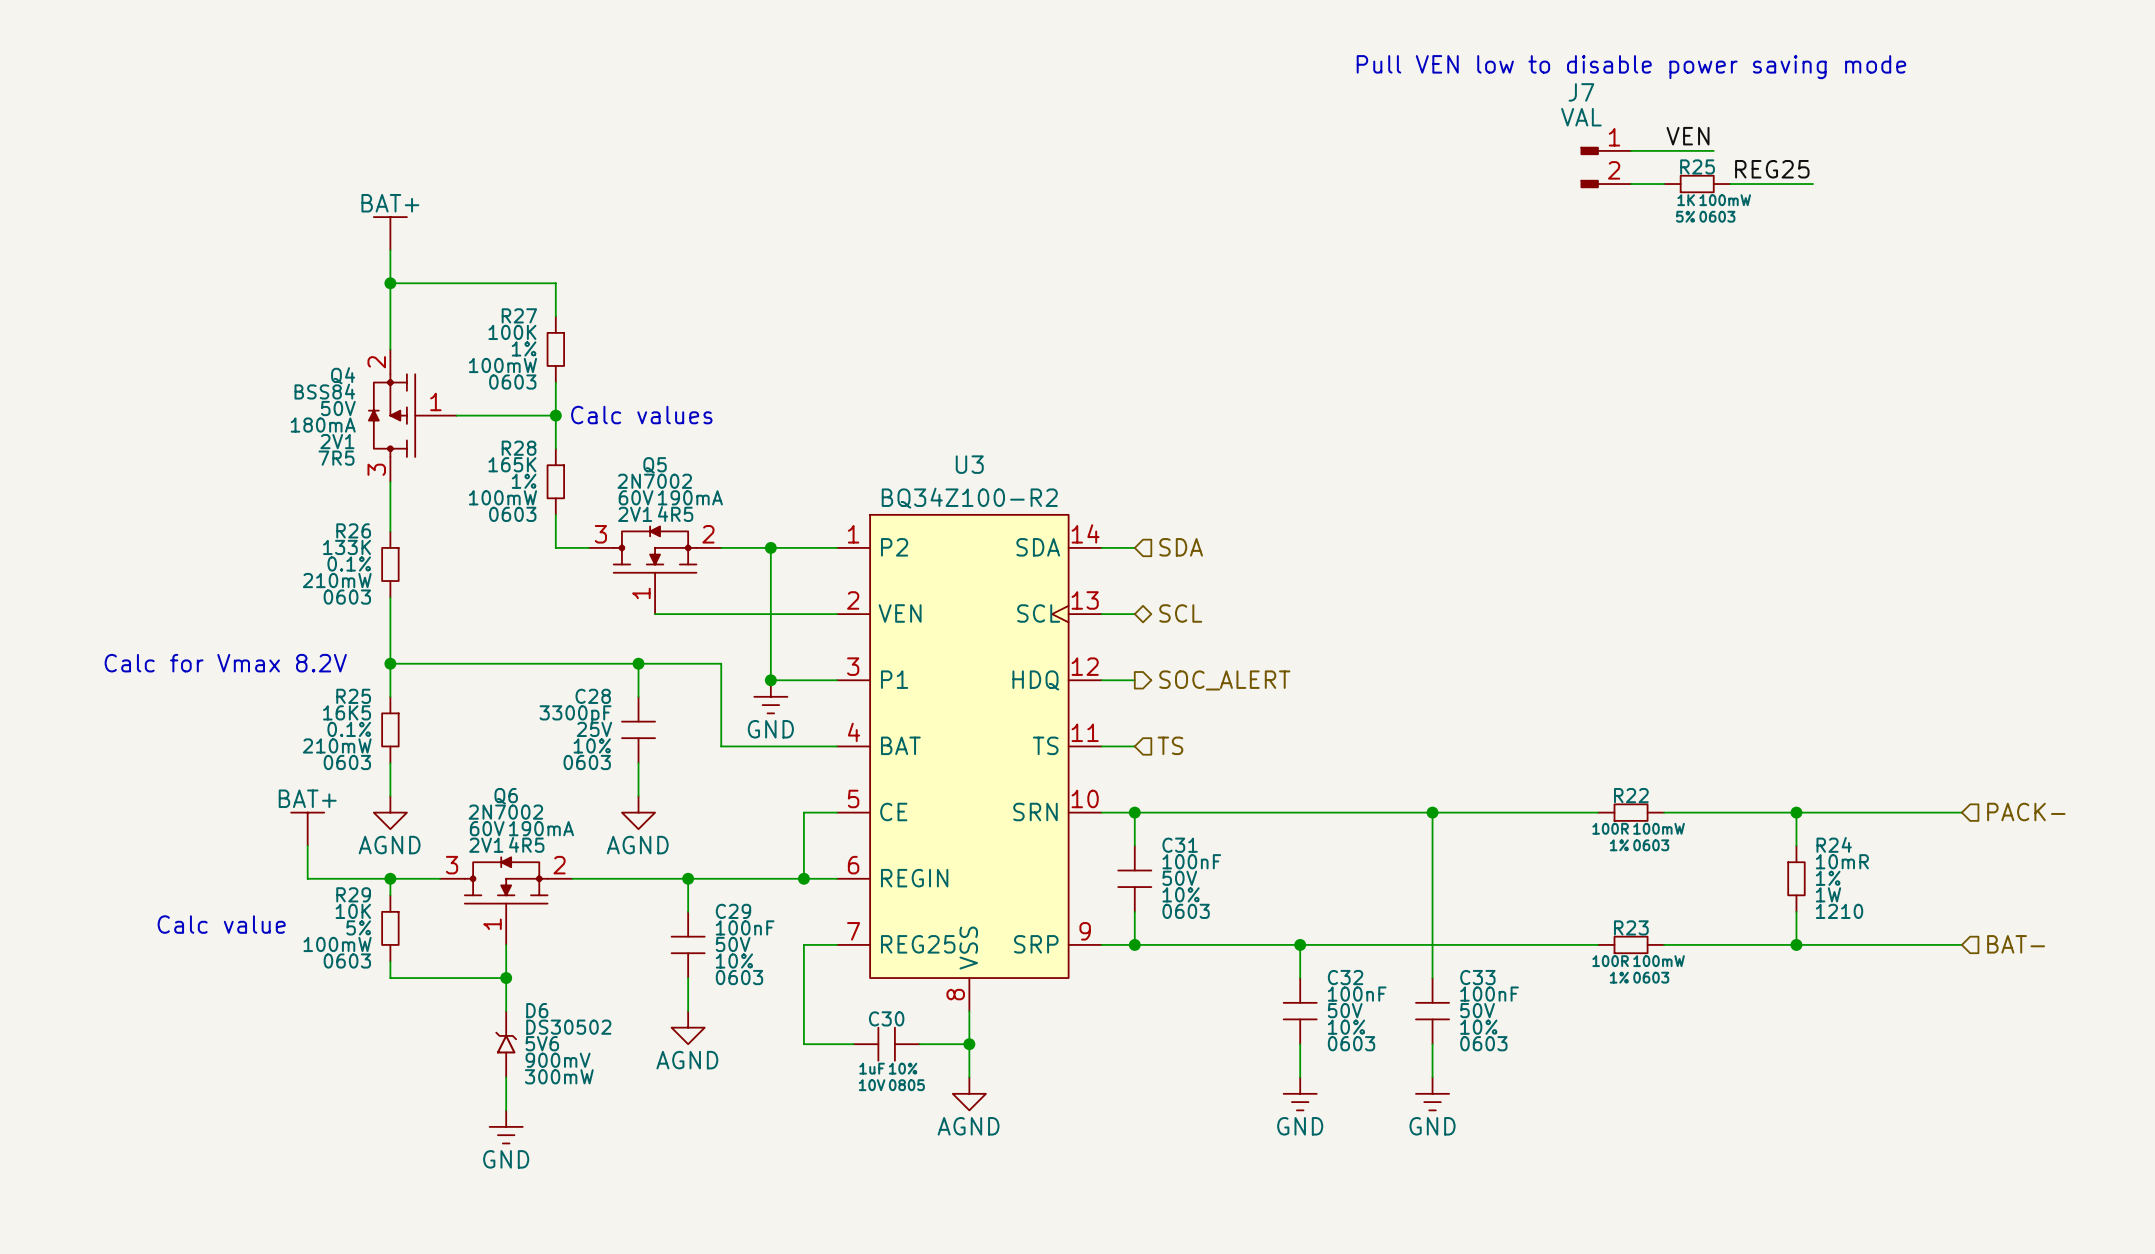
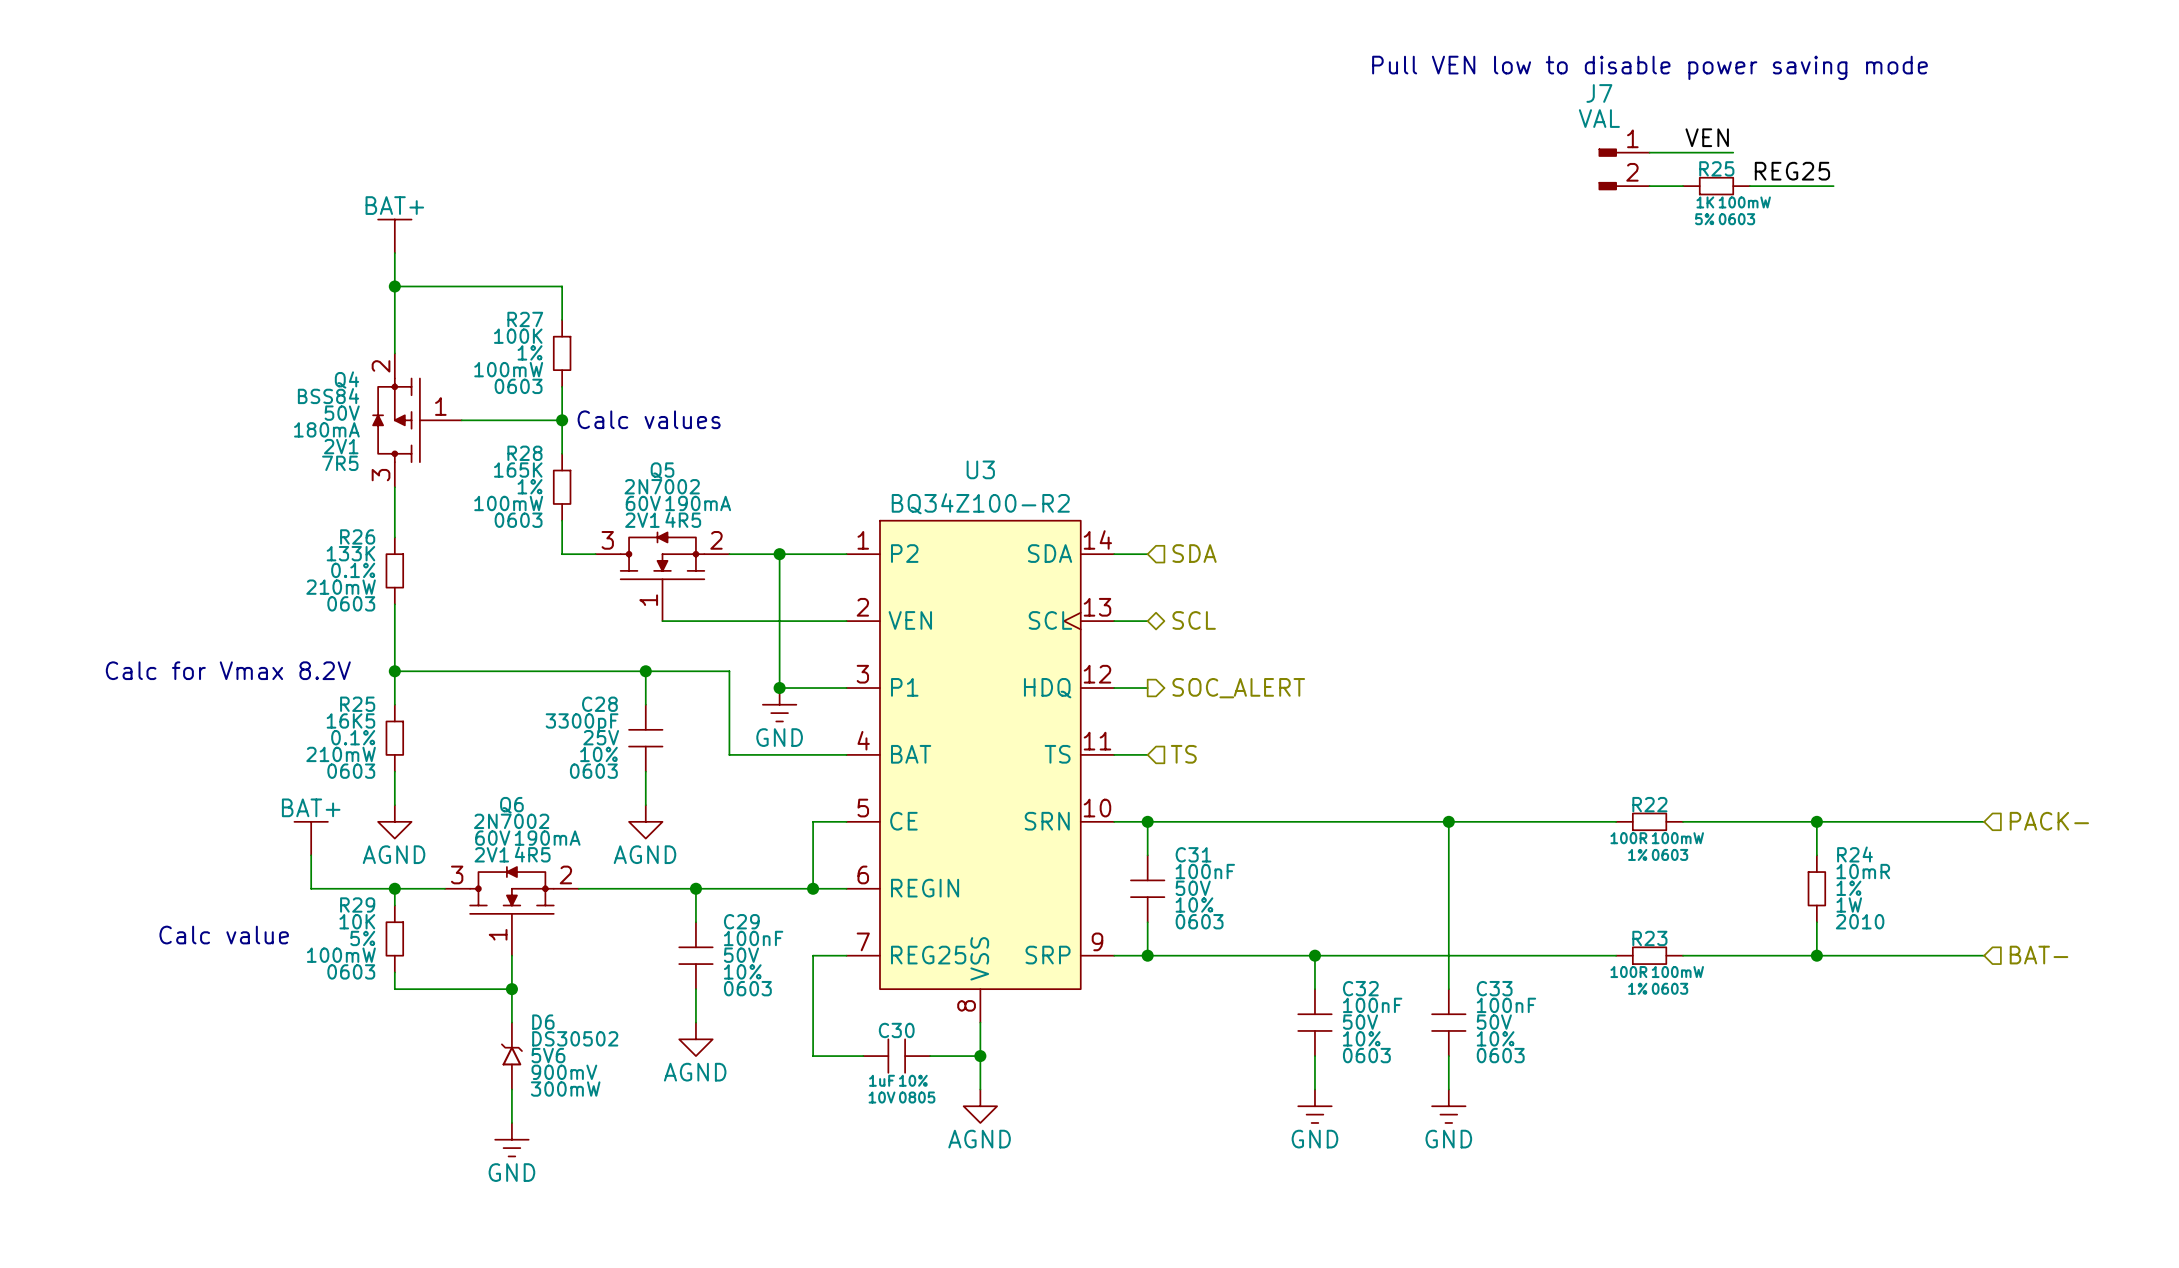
R24 text: 1210 (1839, 911) -> 2010 (1860, 921)

